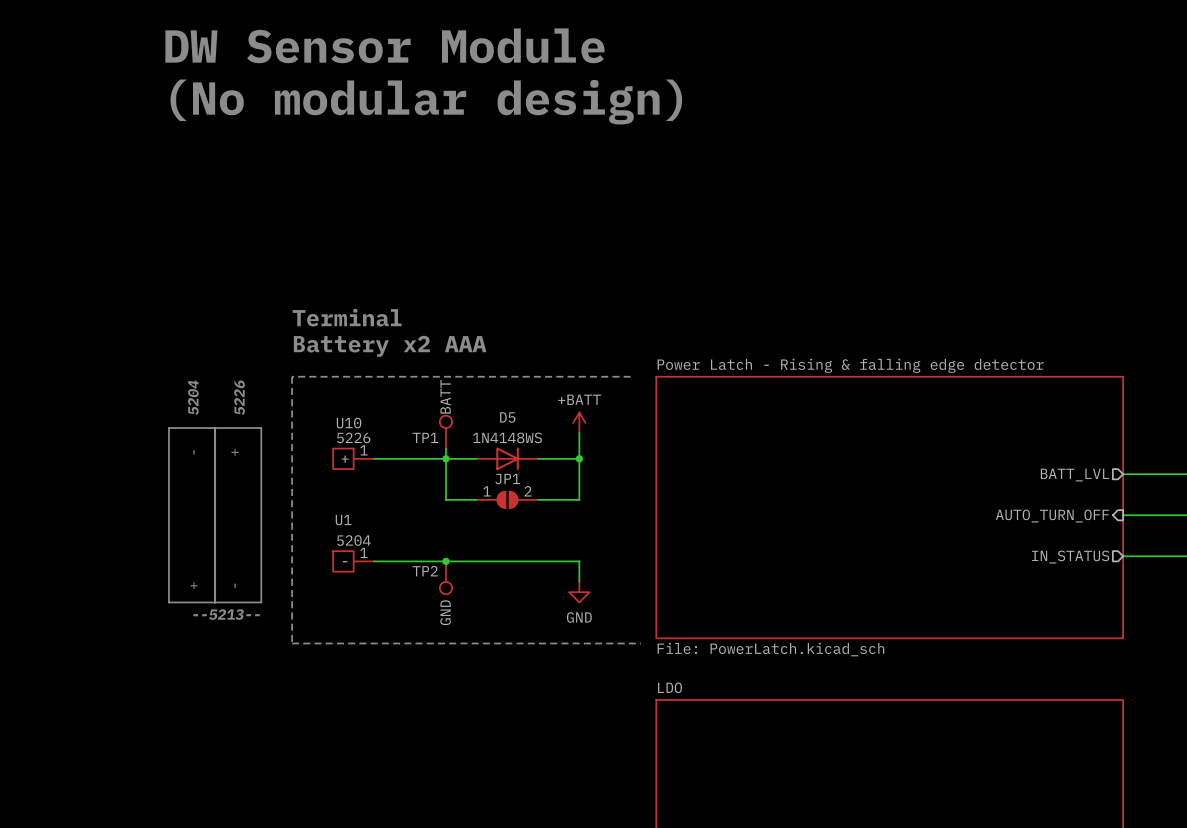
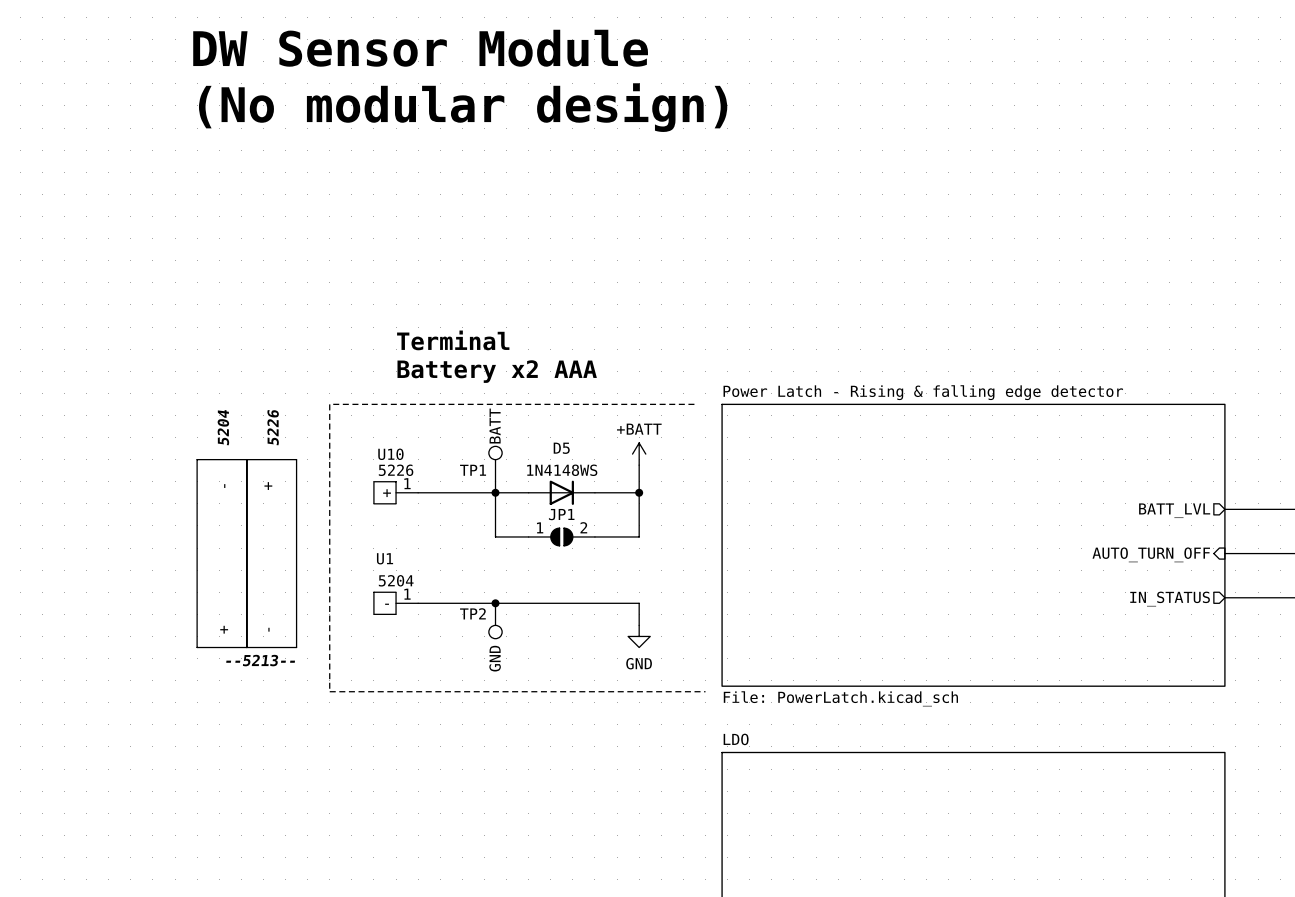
text position: Terminal (347, 317) -> Terminal (453, 340)
text position: Battery x2 AAA (390, 346) -> Battery x2 AAA (497, 371)

